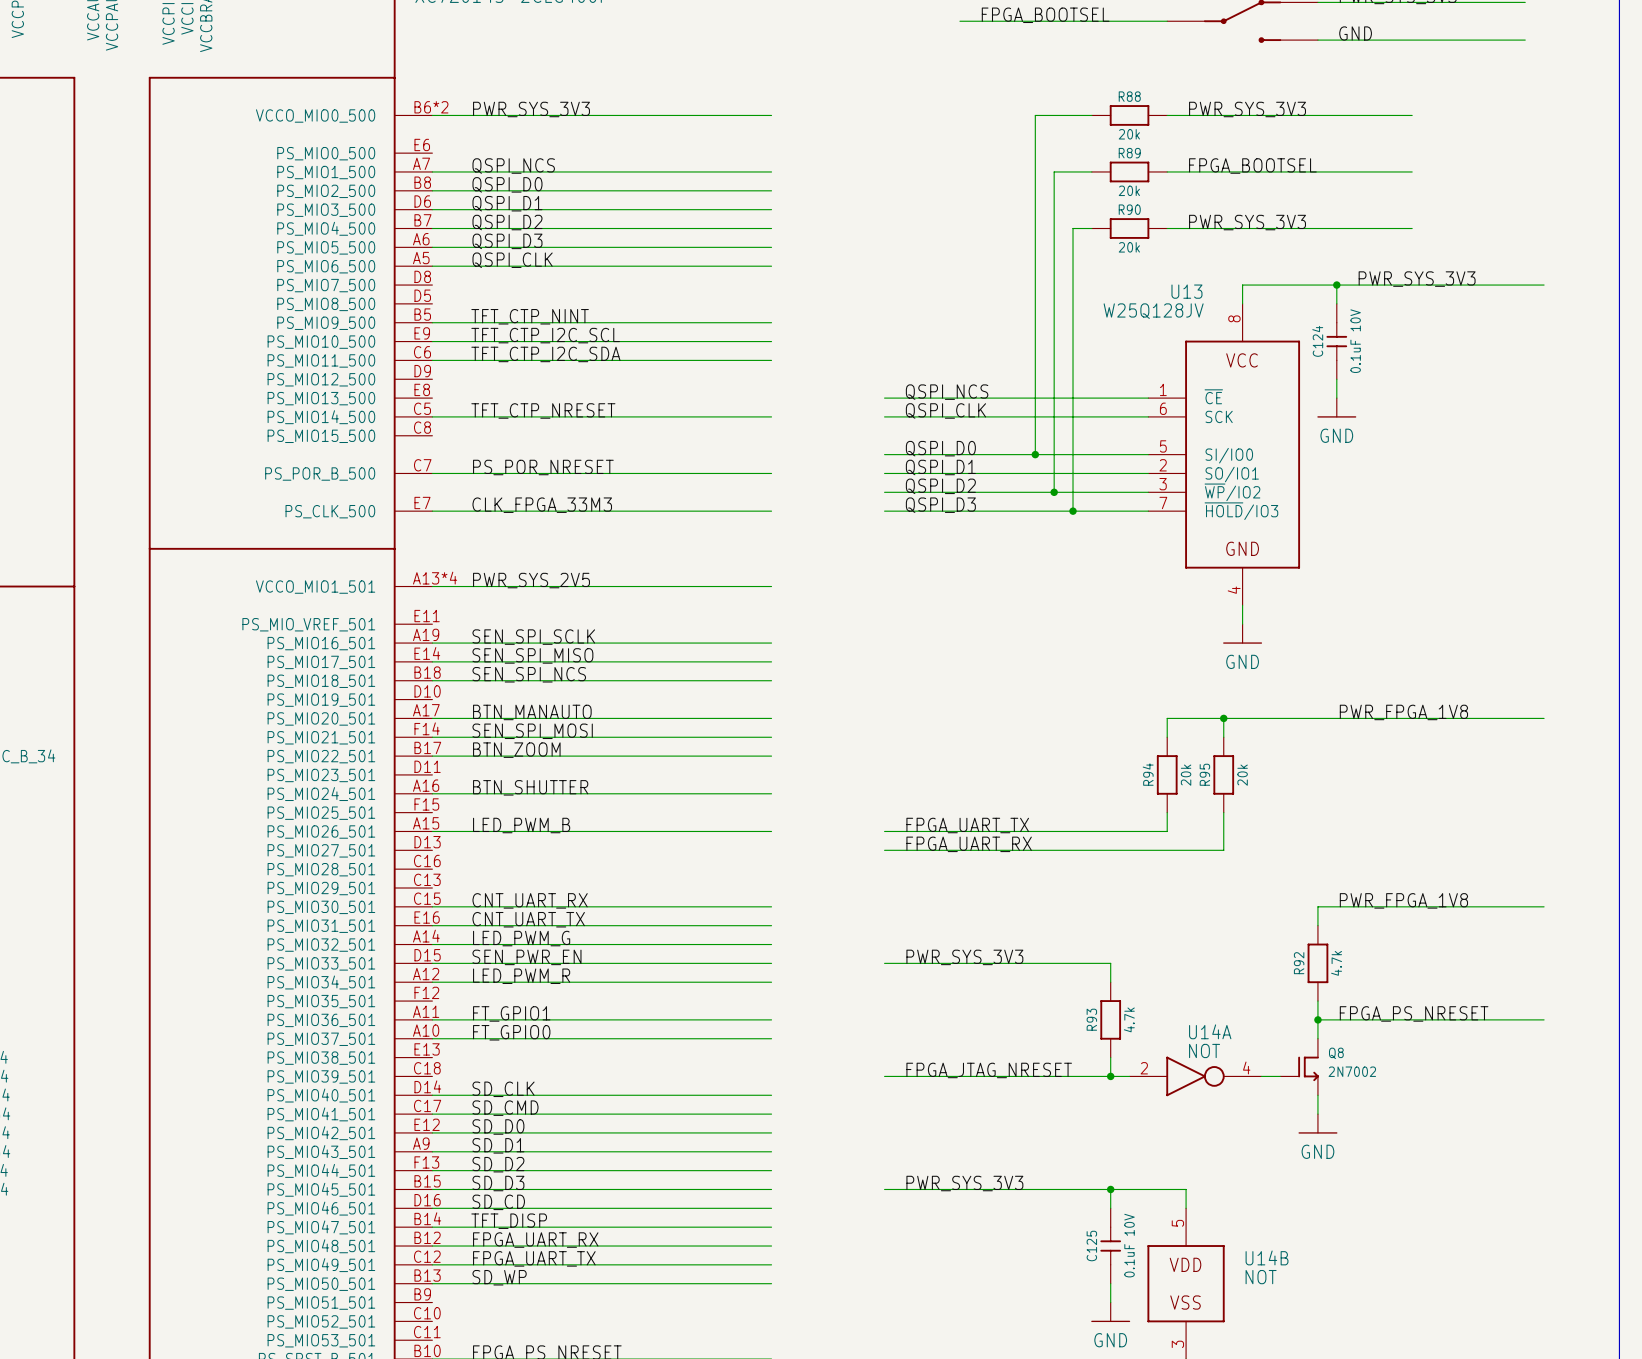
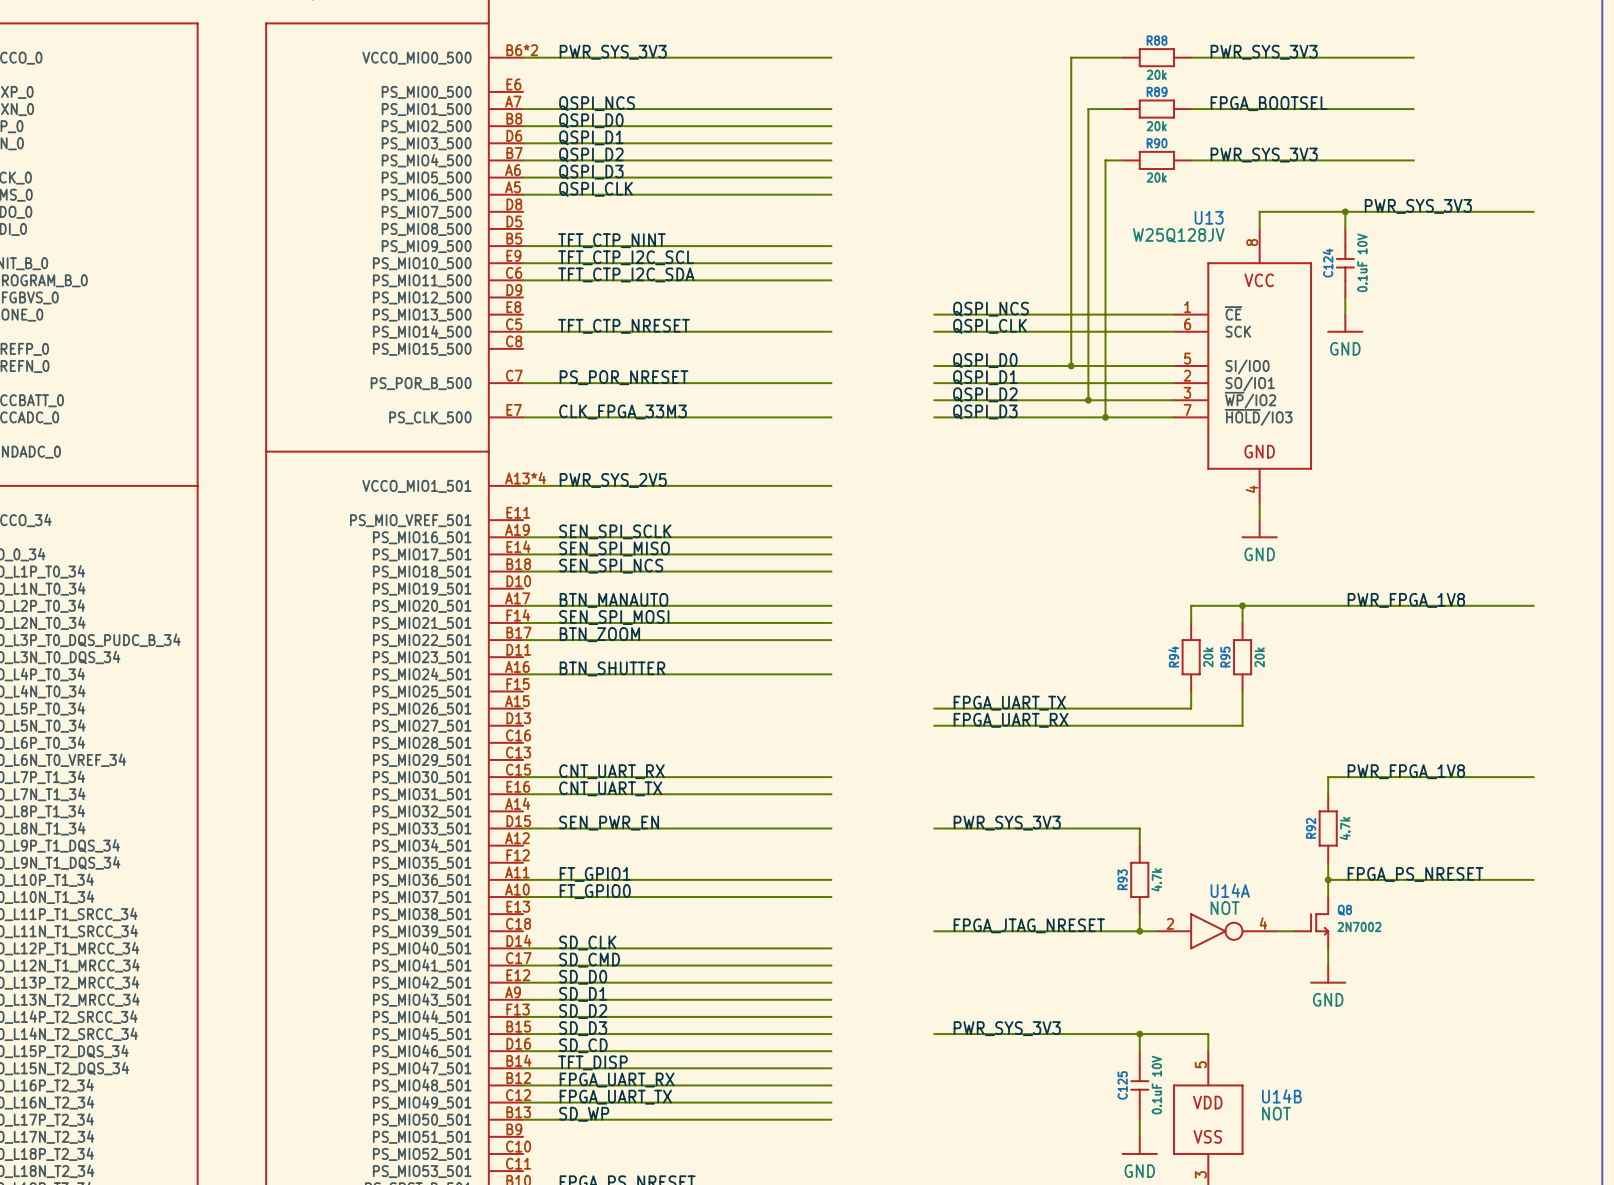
label: LED_PWM_B (521, 825) -> none
wire: (432, 831) (771, 831) -> none
label: LED_PWM_G (521, 938) -> none
wire: (432, 944) (771, 944) -> none
label: LED_PWM_R (521, 976) -> none
wire: (432, 982) (771, 982) -> none

